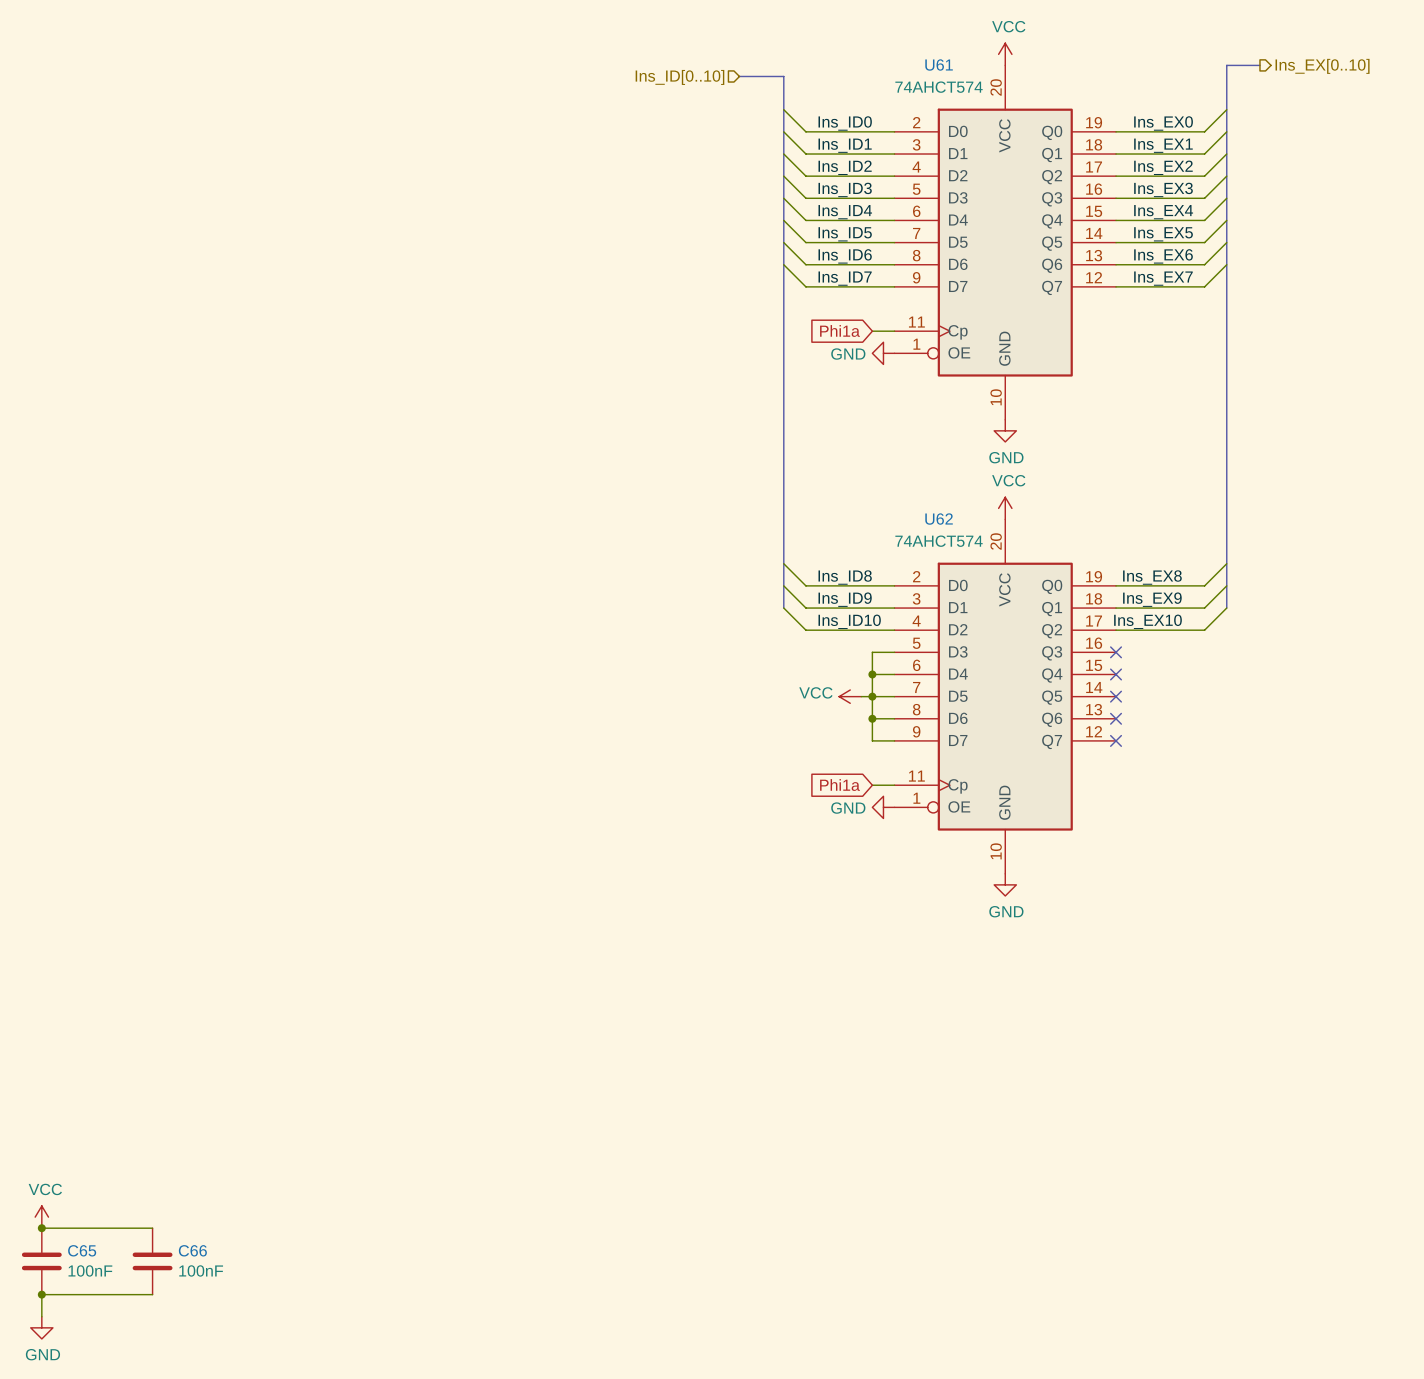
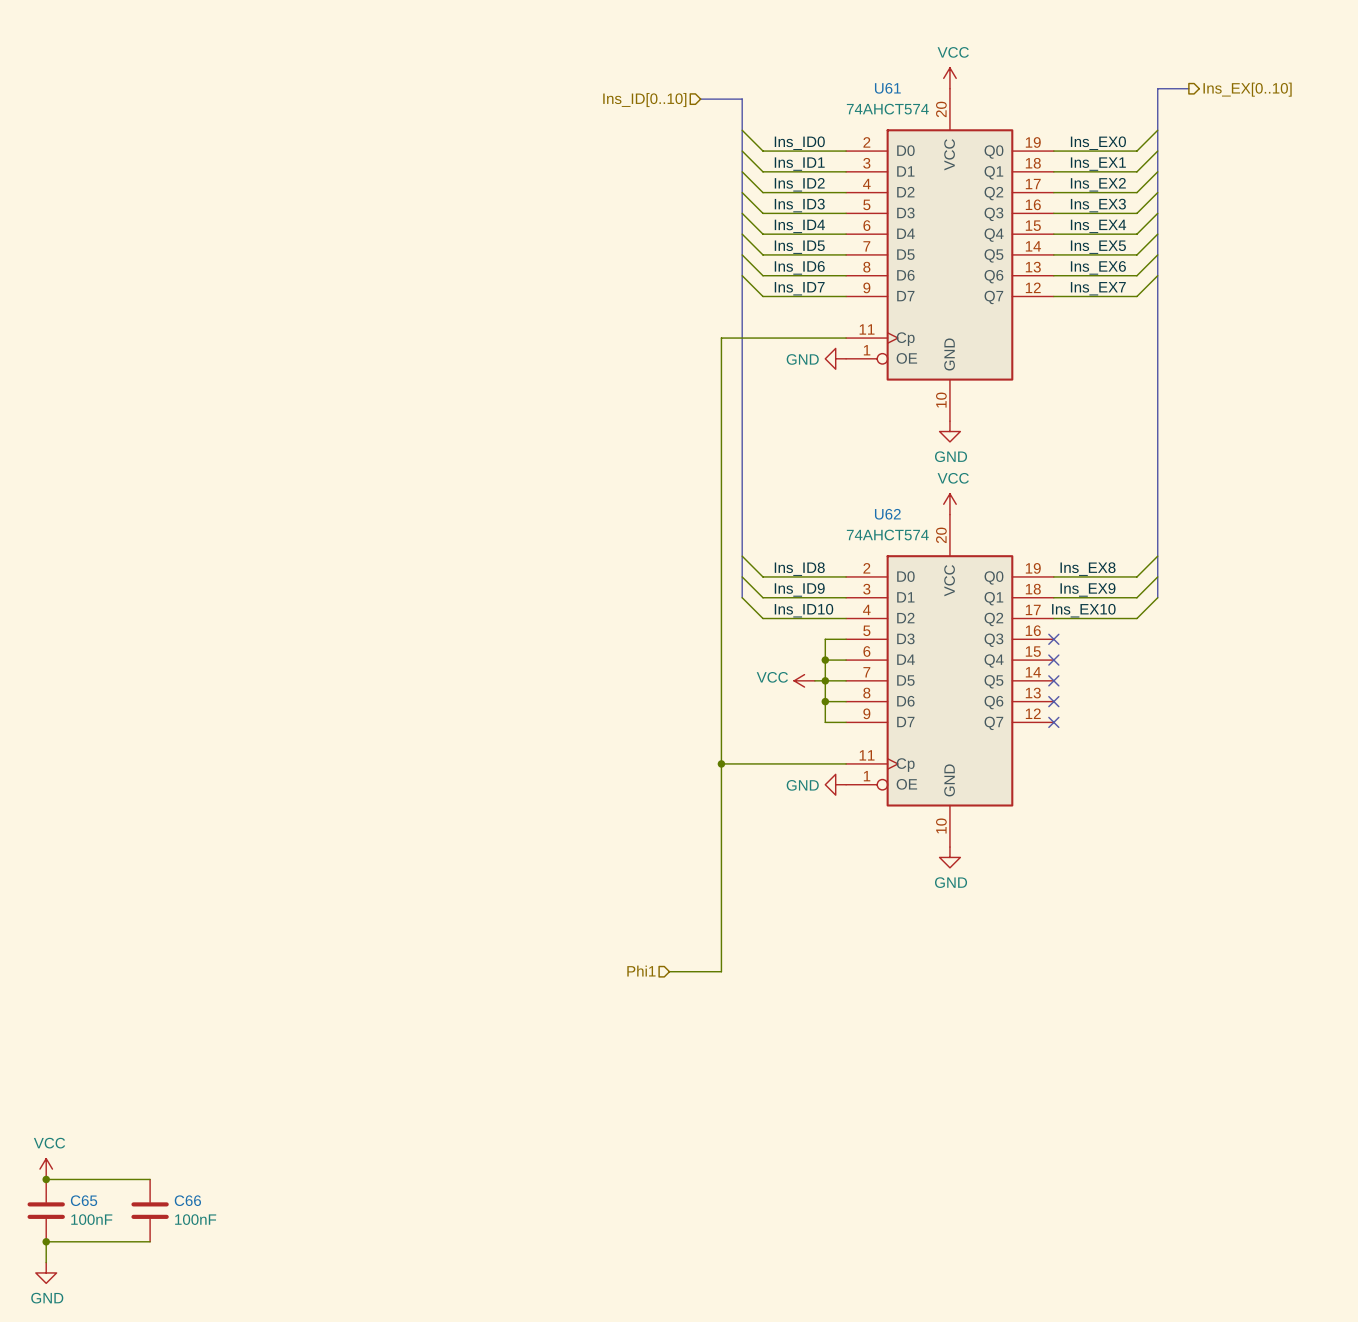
global label: Phi1a (840, 330) -> none
wire: none -> (825, 338) (721, 338) (721, 971) (669, 971)
wire: none -> (721, 763) (825, 763)
junction: none -> (721, 763)
global label: Phi1a (840, 785) -> none
hierarchical label: none -> Phi1 (641, 971)

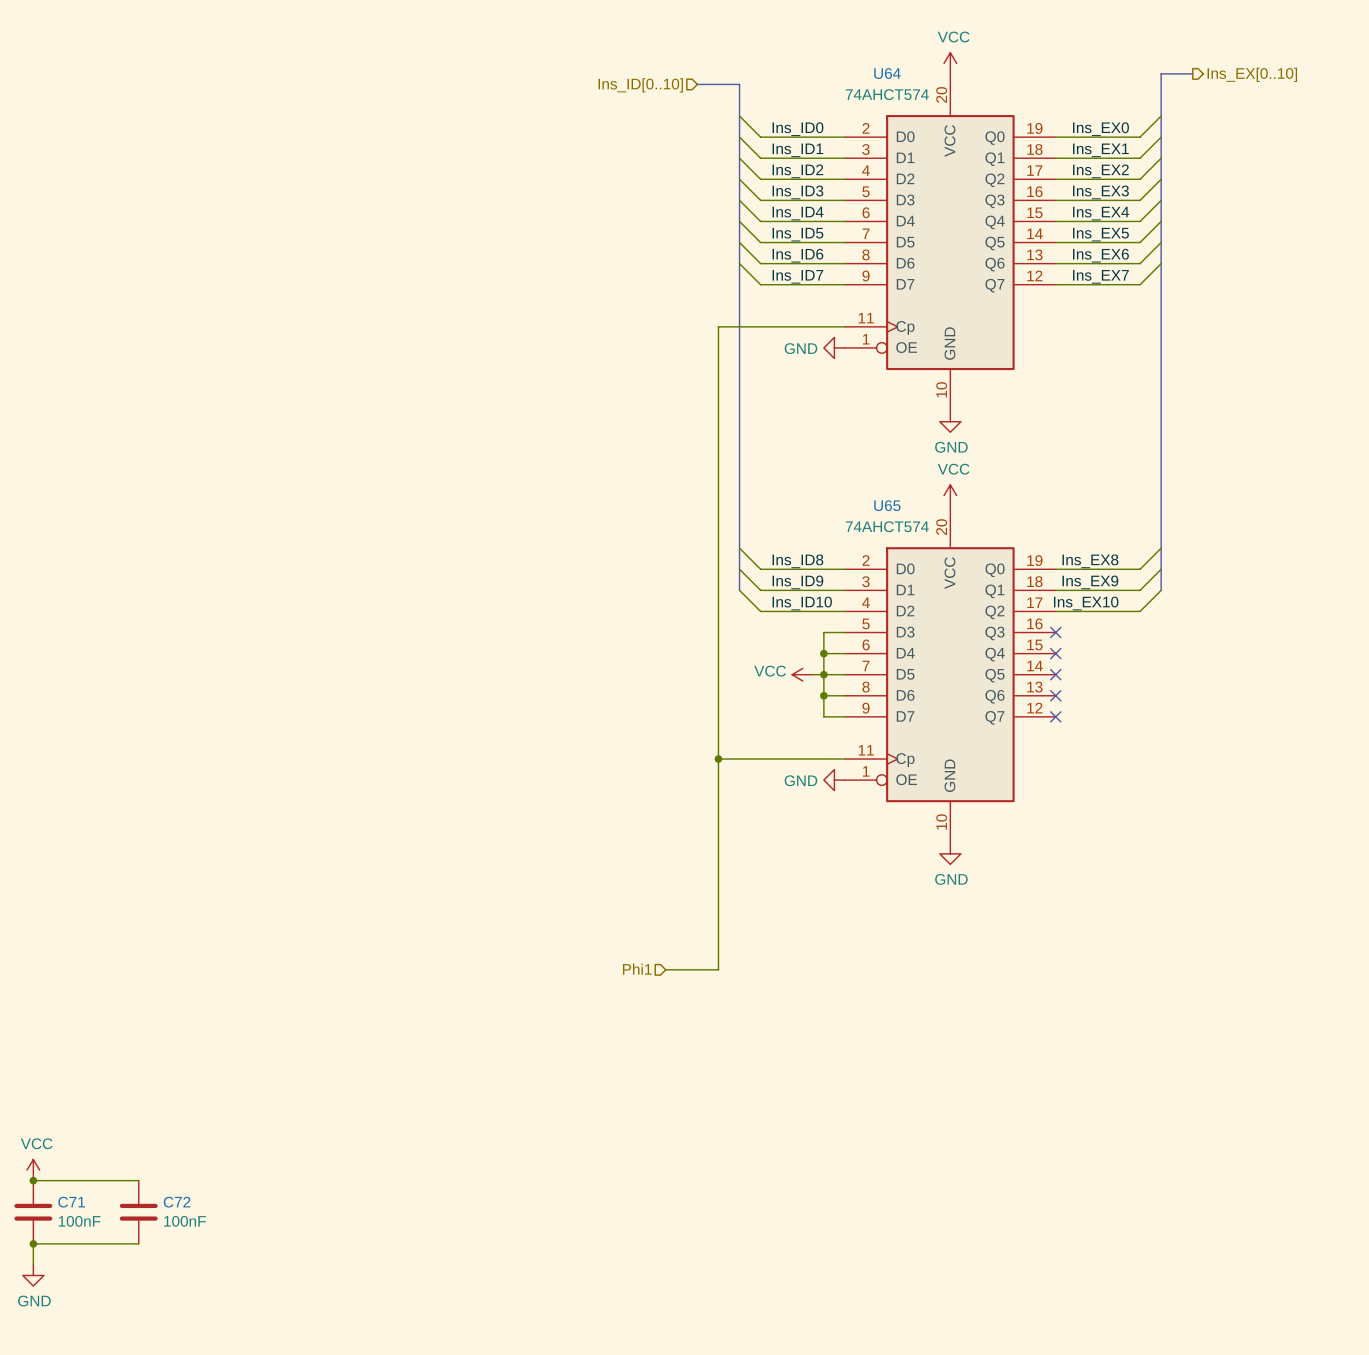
U61 name: U61 (887, 88) -> U64 (887, 73)
U62 name: U62 (887, 514) -> U65 (887, 505)
C65 name: C65 (84, 1200) -> C71 (71, 1202)
C66 name: C66 (187, 1200) -> C72 (177, 1202)

